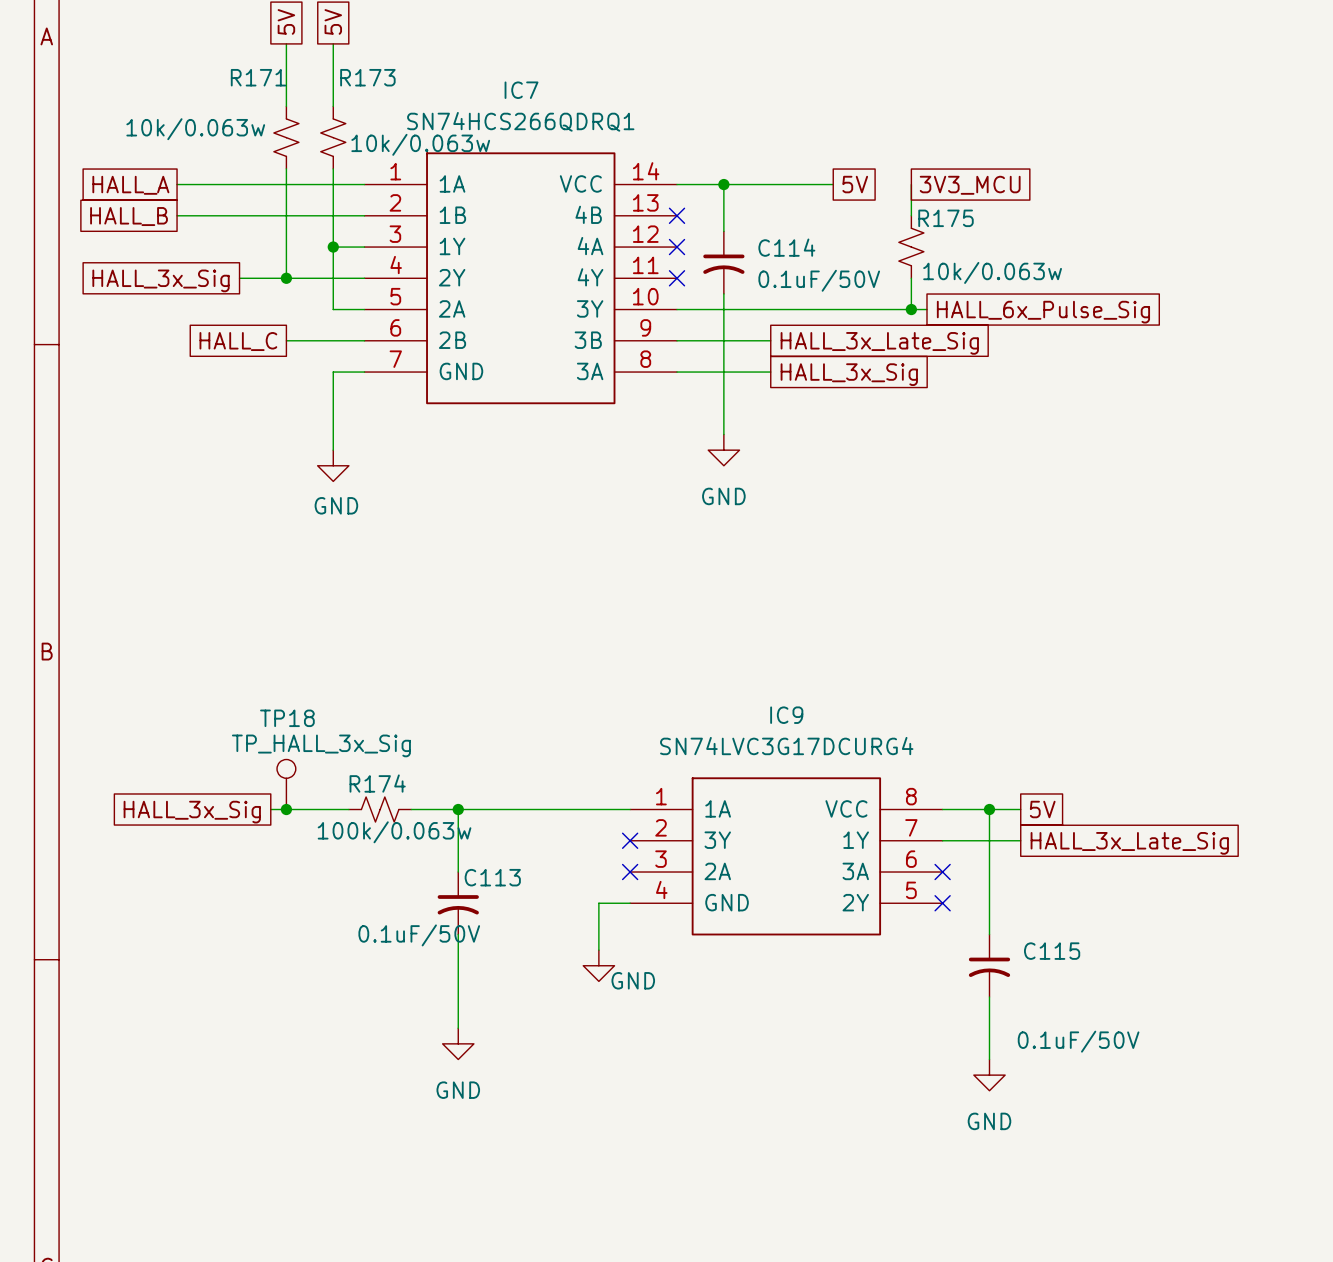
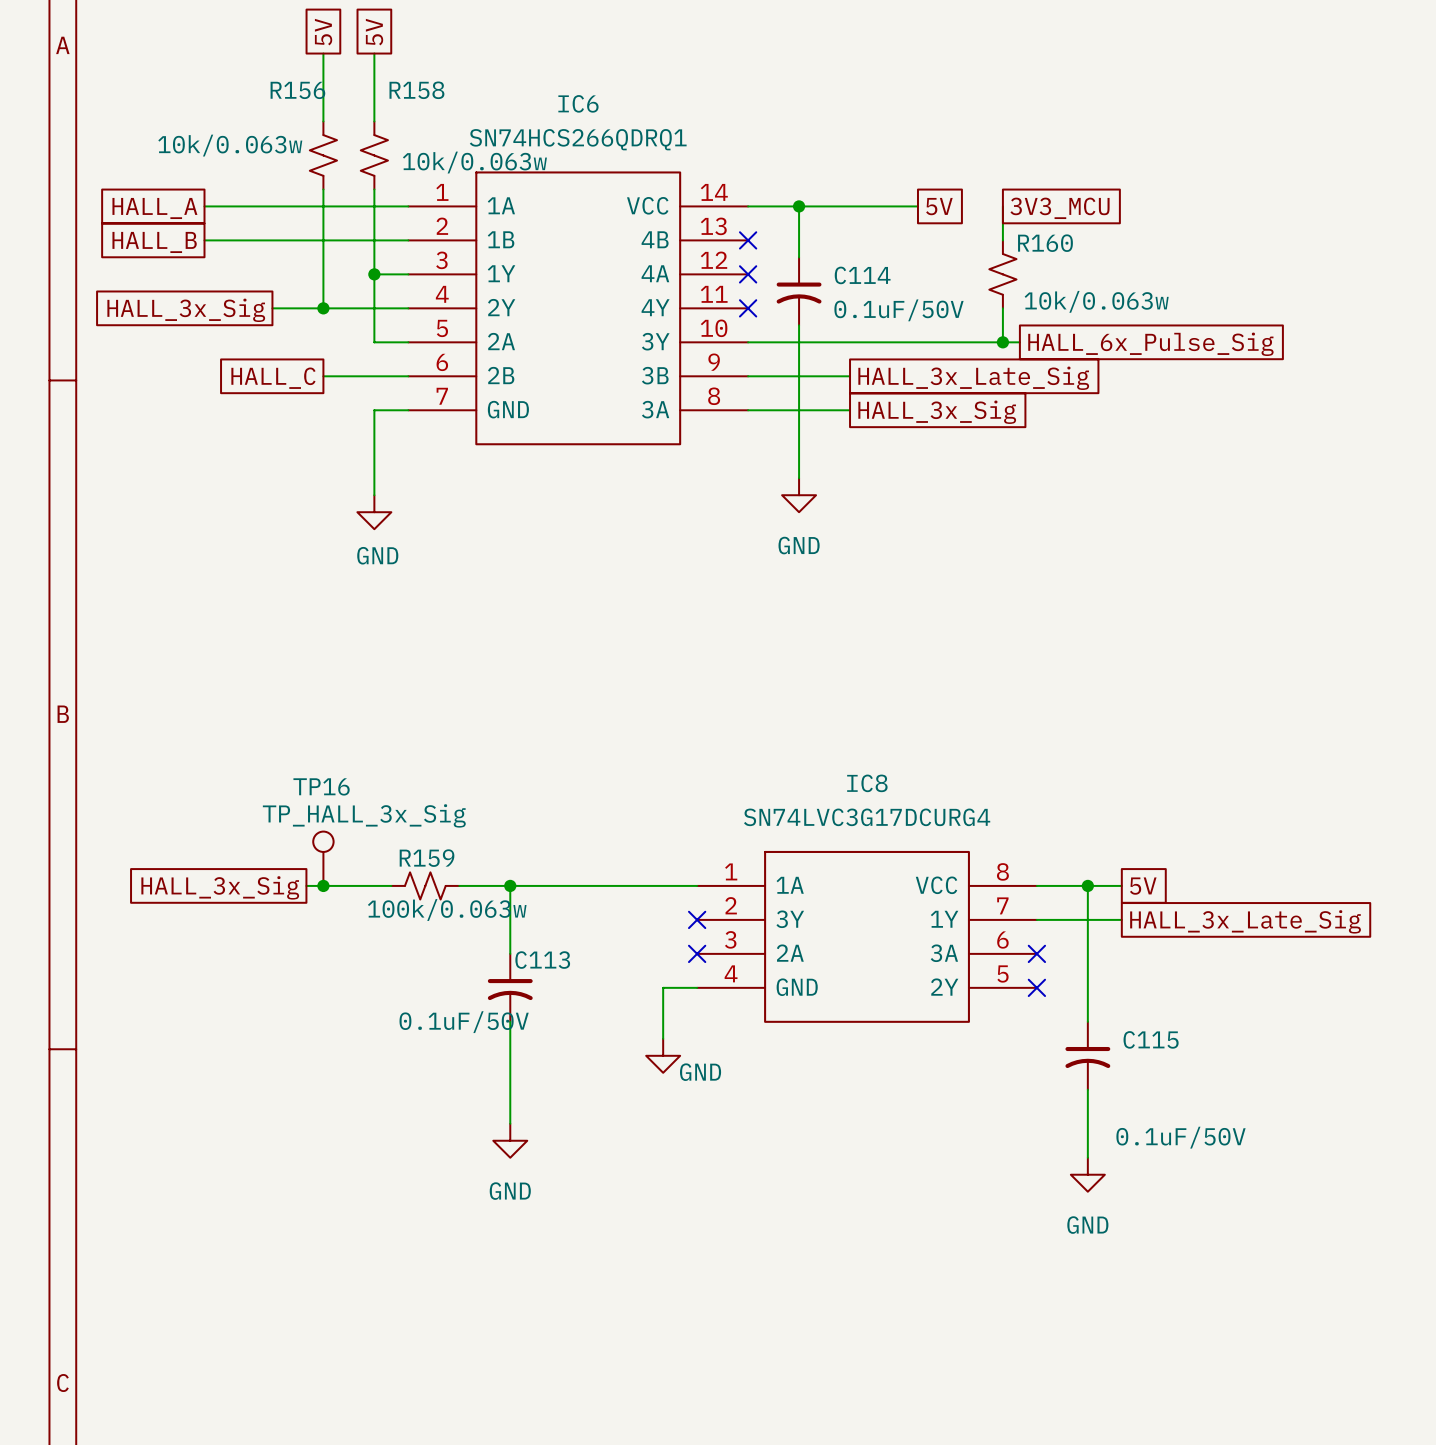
R171 name: R171 (258, 77) -> R156 (297, 90)
R173 name: R173 (367, 77) -> R158 (416, 90)
IC7 name: IC7 (521, 90) -> IC6 (578, 103)
R175 name: R175 (946, 218) -> R160 (1045, 243)
IC9 name: IC9 (786, 715) -> IC8 (867, 783)
TP18 name: TP18 (287, 718) -> TP16 (321, 786)
R174 name: R174 (377, 783) -> R159 (427, 858)

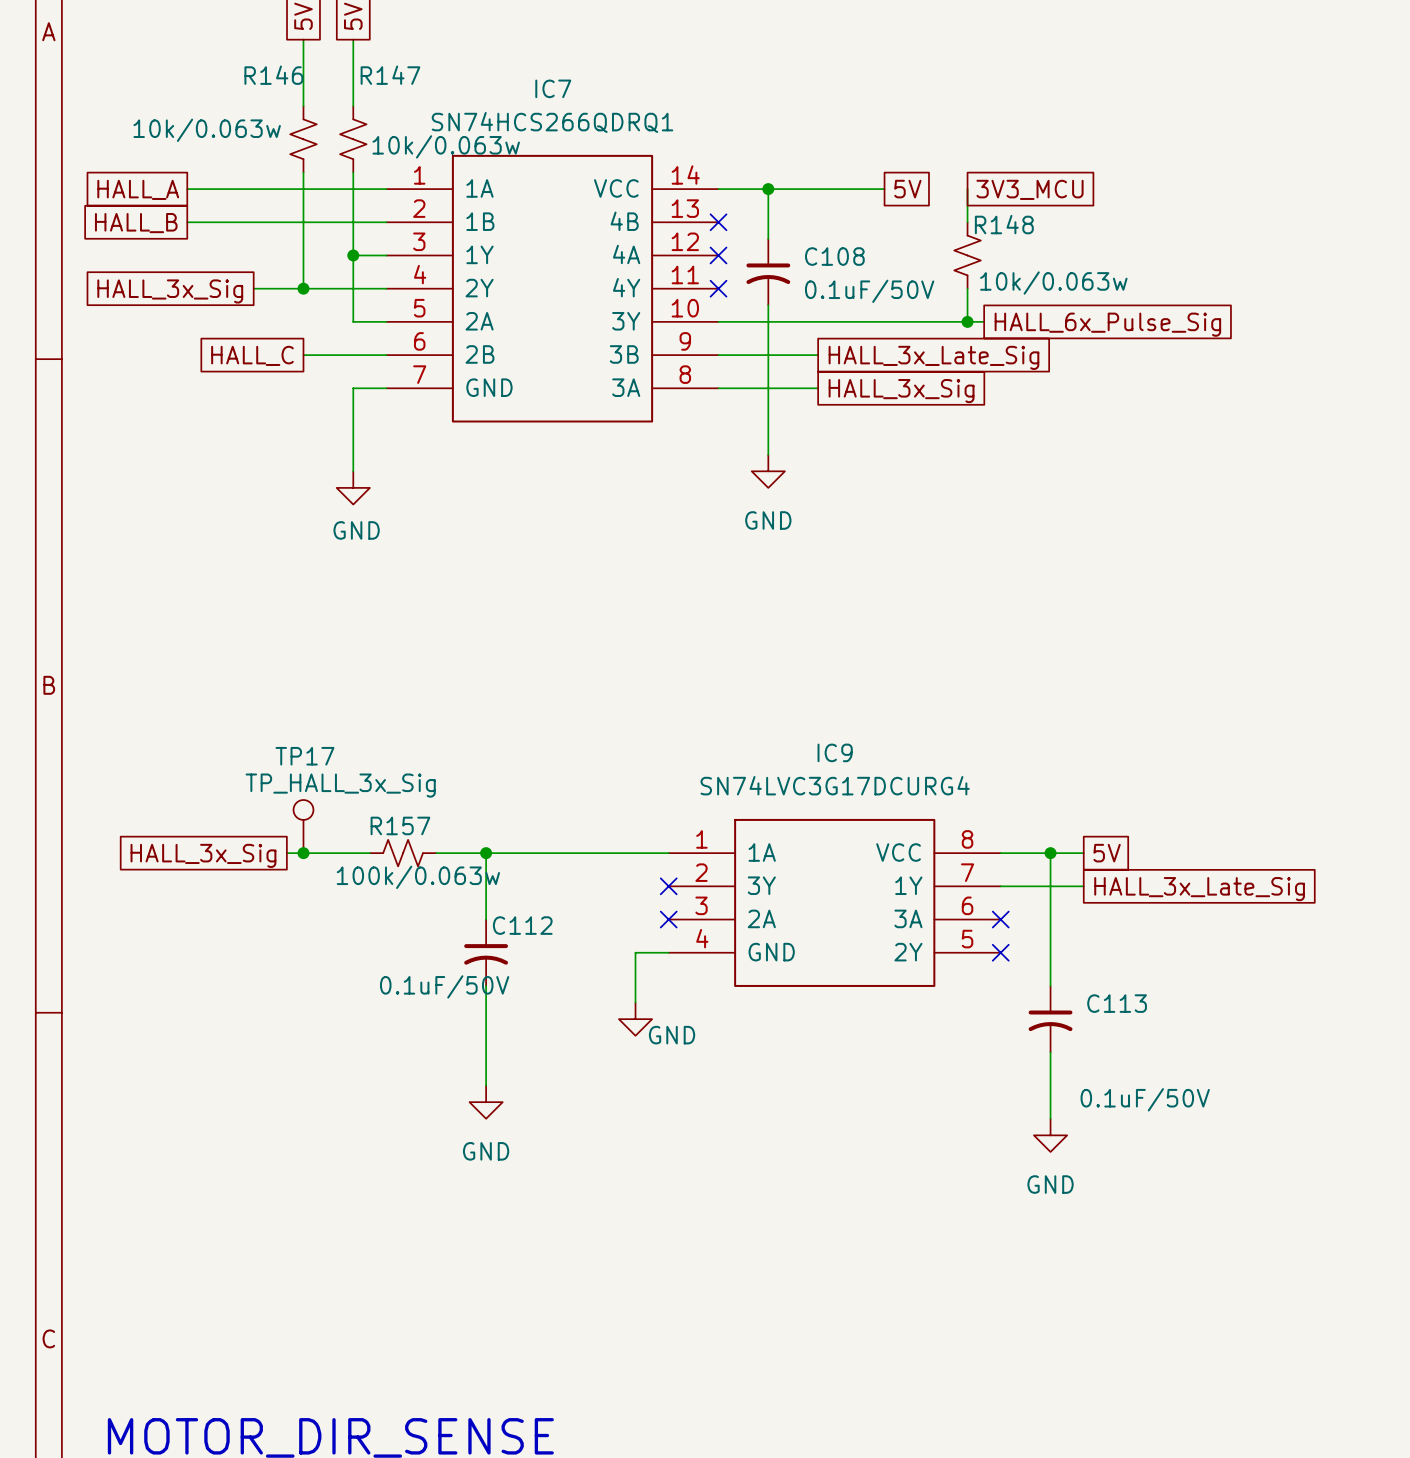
R156 name: R156 (297, 90) -> R146 (273, 75)
R158 name: R158 (416, 90) -> R147 (390, 75)
IC6 name: IC6 (578, 103) -> IC7 (553, 88)
R160 name: R160 (1045, 243) -> R148 (1004, 224)
C114 name: C114 (862, 275) -> C108 (834, 256)
IC8 name: IC8 (867, 783) -> IC9 (835, 752)
TP16 name: TP16 (321, 786) -> TP17 (304, 756)
R159 name: R159 (427, 858) -> R157 (400, 825)
C113 name: C113 (542, 960) -> C112 (522, 925)
C115 name: C115 (1151, 1039) -> C113 (1117, 1003)

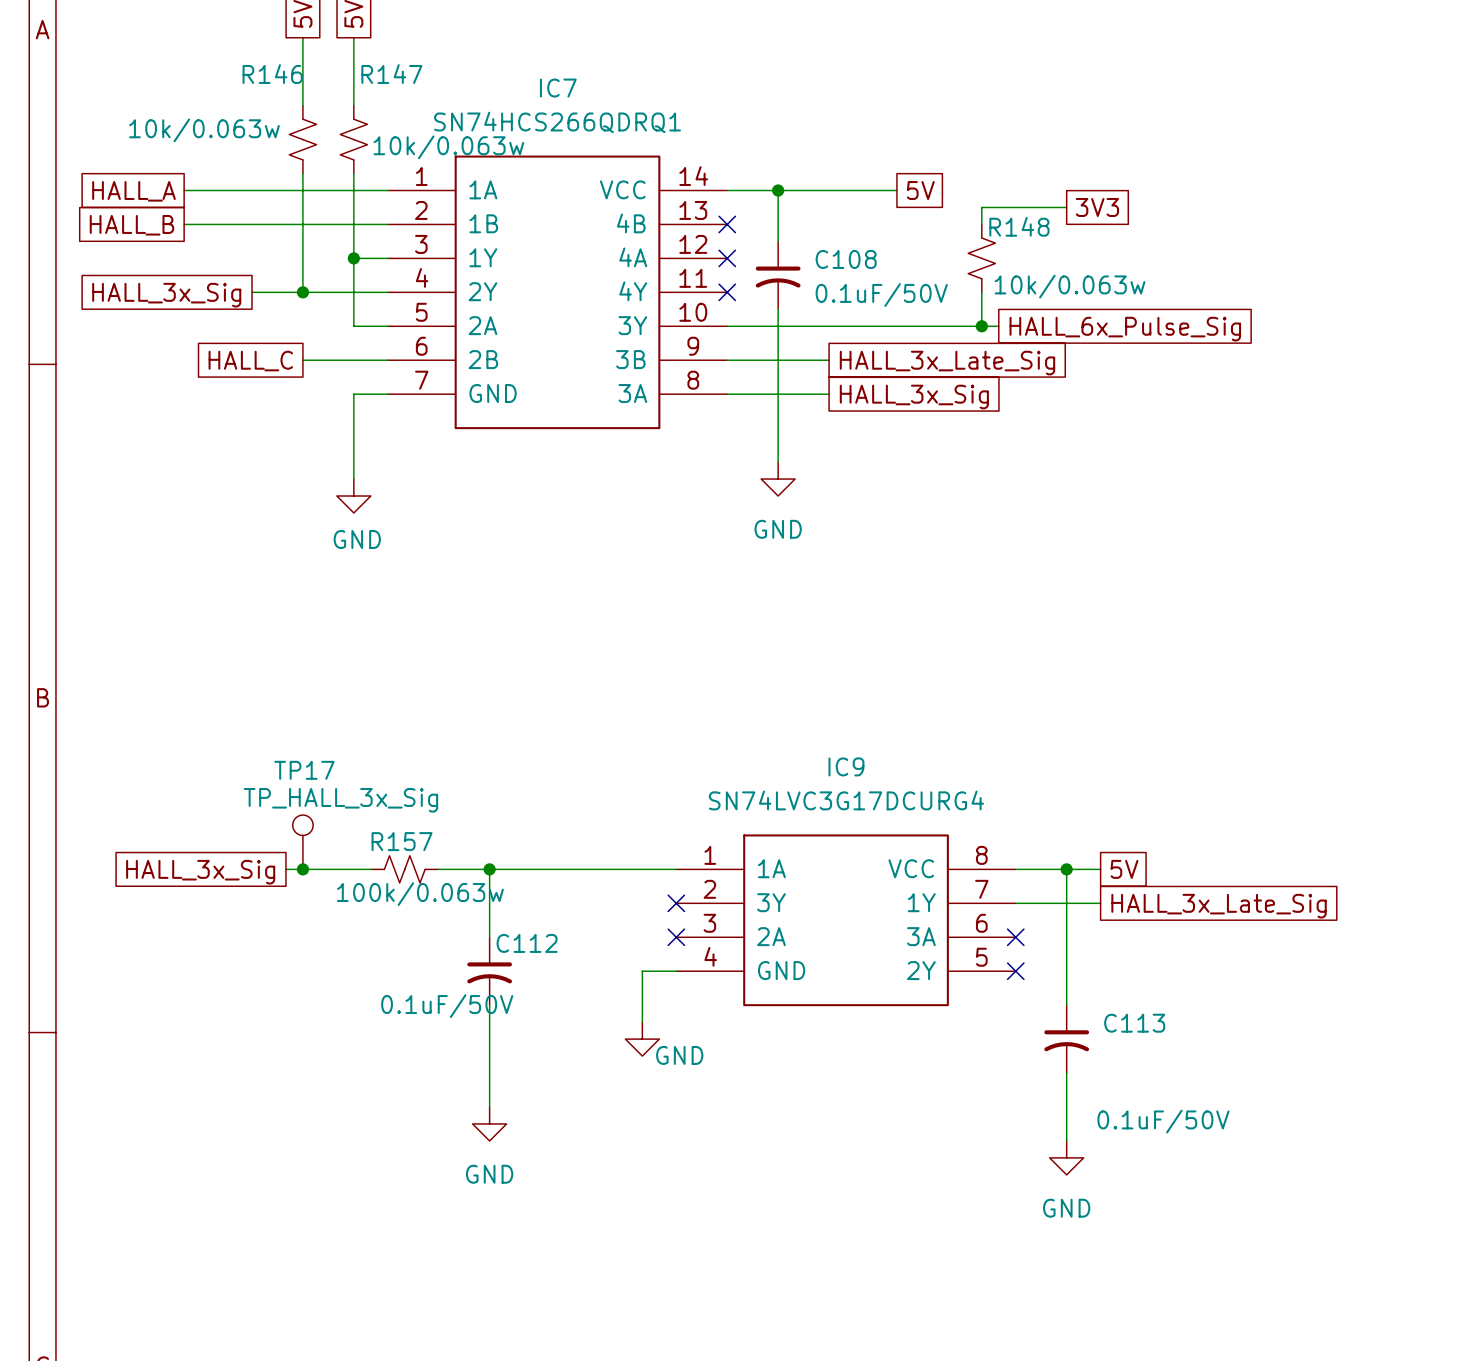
global label: 3V3_MCU (1030, 189) -> none
global label: none -> 3V3 (1097, 207)

